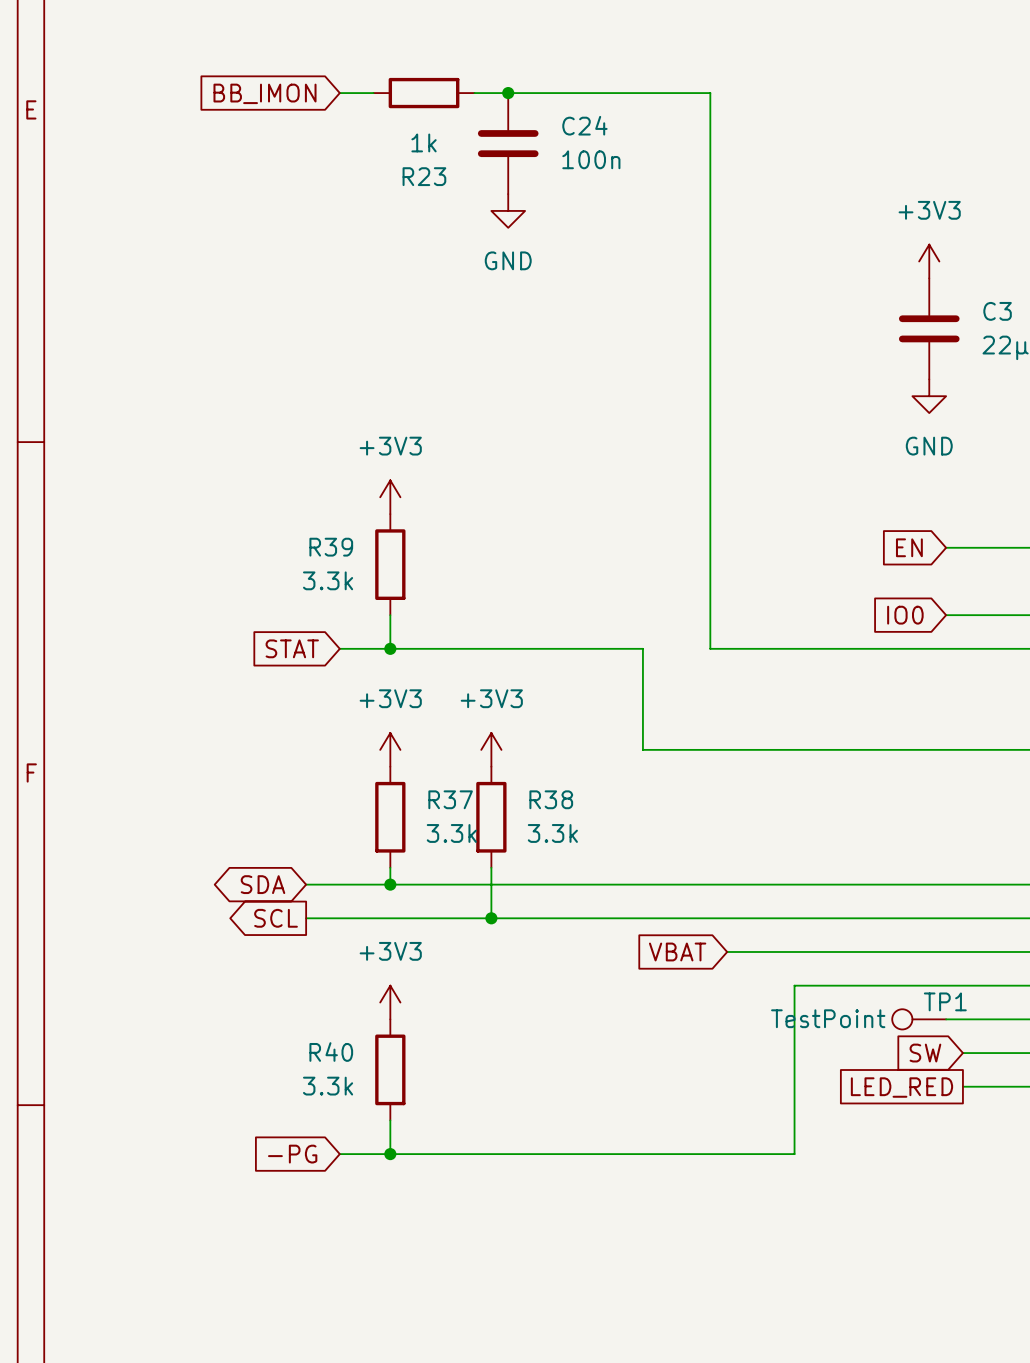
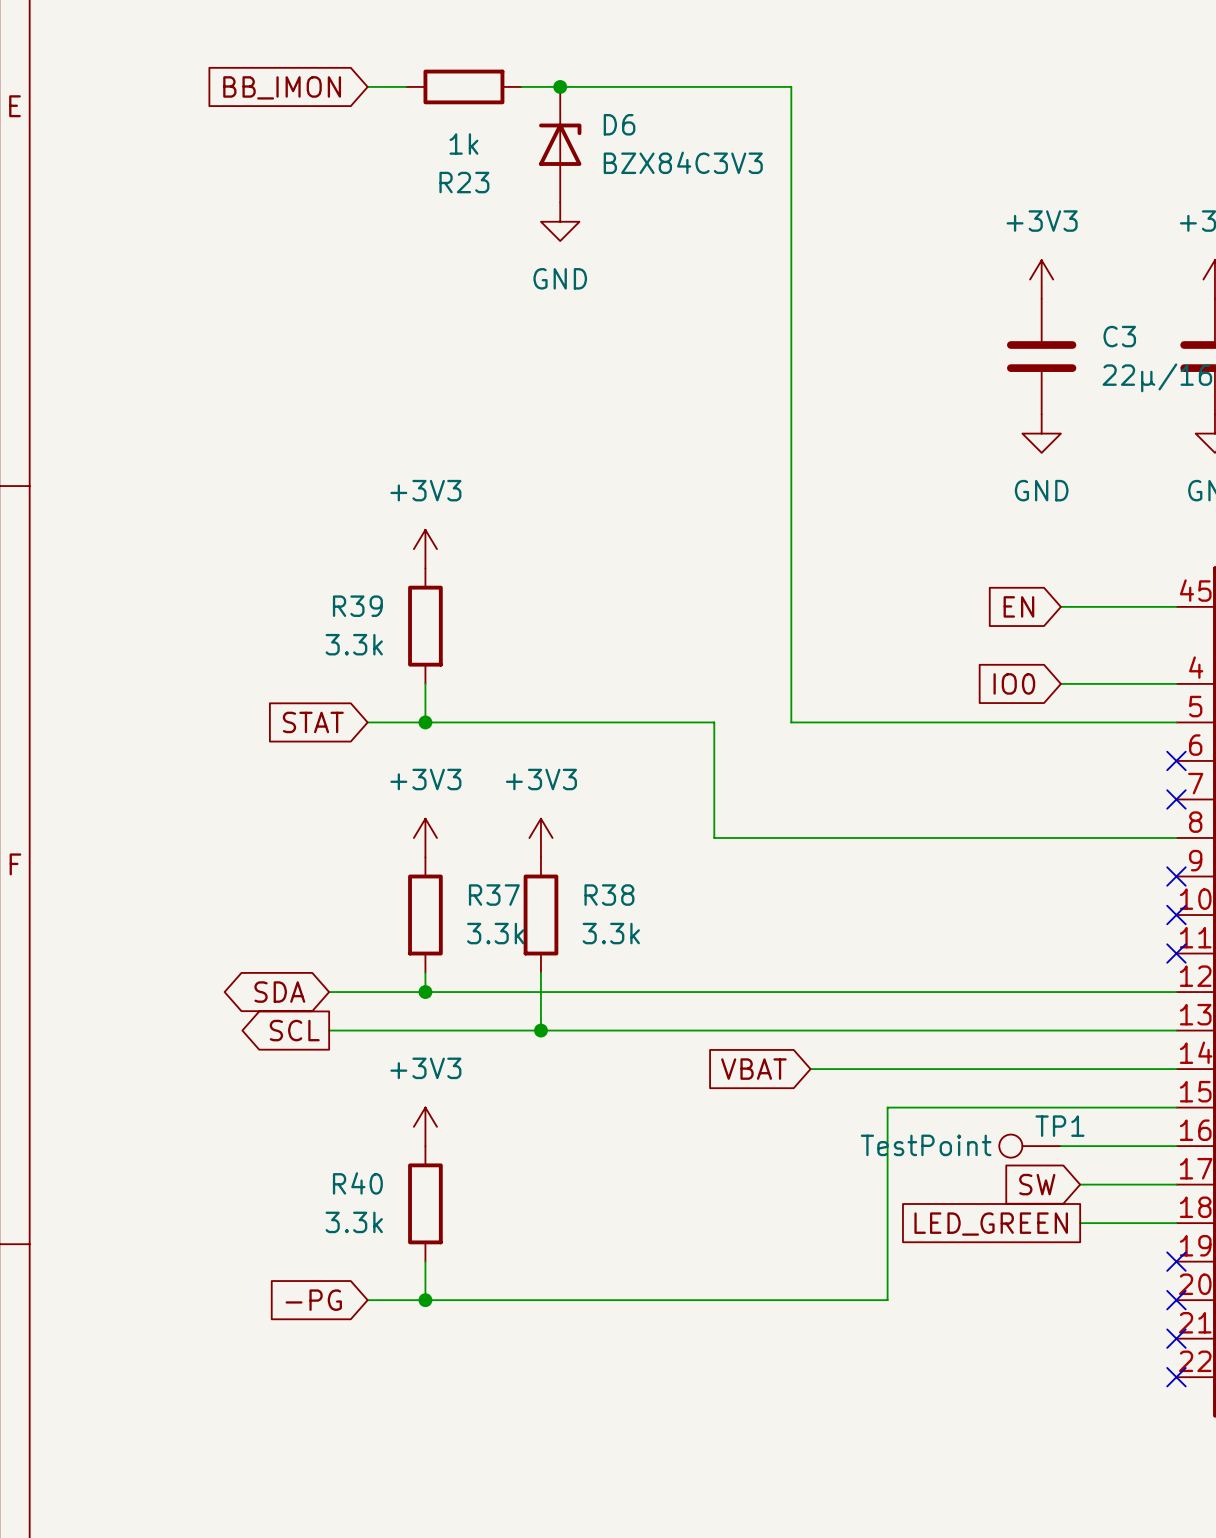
C24: 100n (508, 143) -> none
D6: none -> BZX84C3V3 (560, 144)
global label: LED_RED (901, 1087) -> LED_GREEN (991, 1224)

